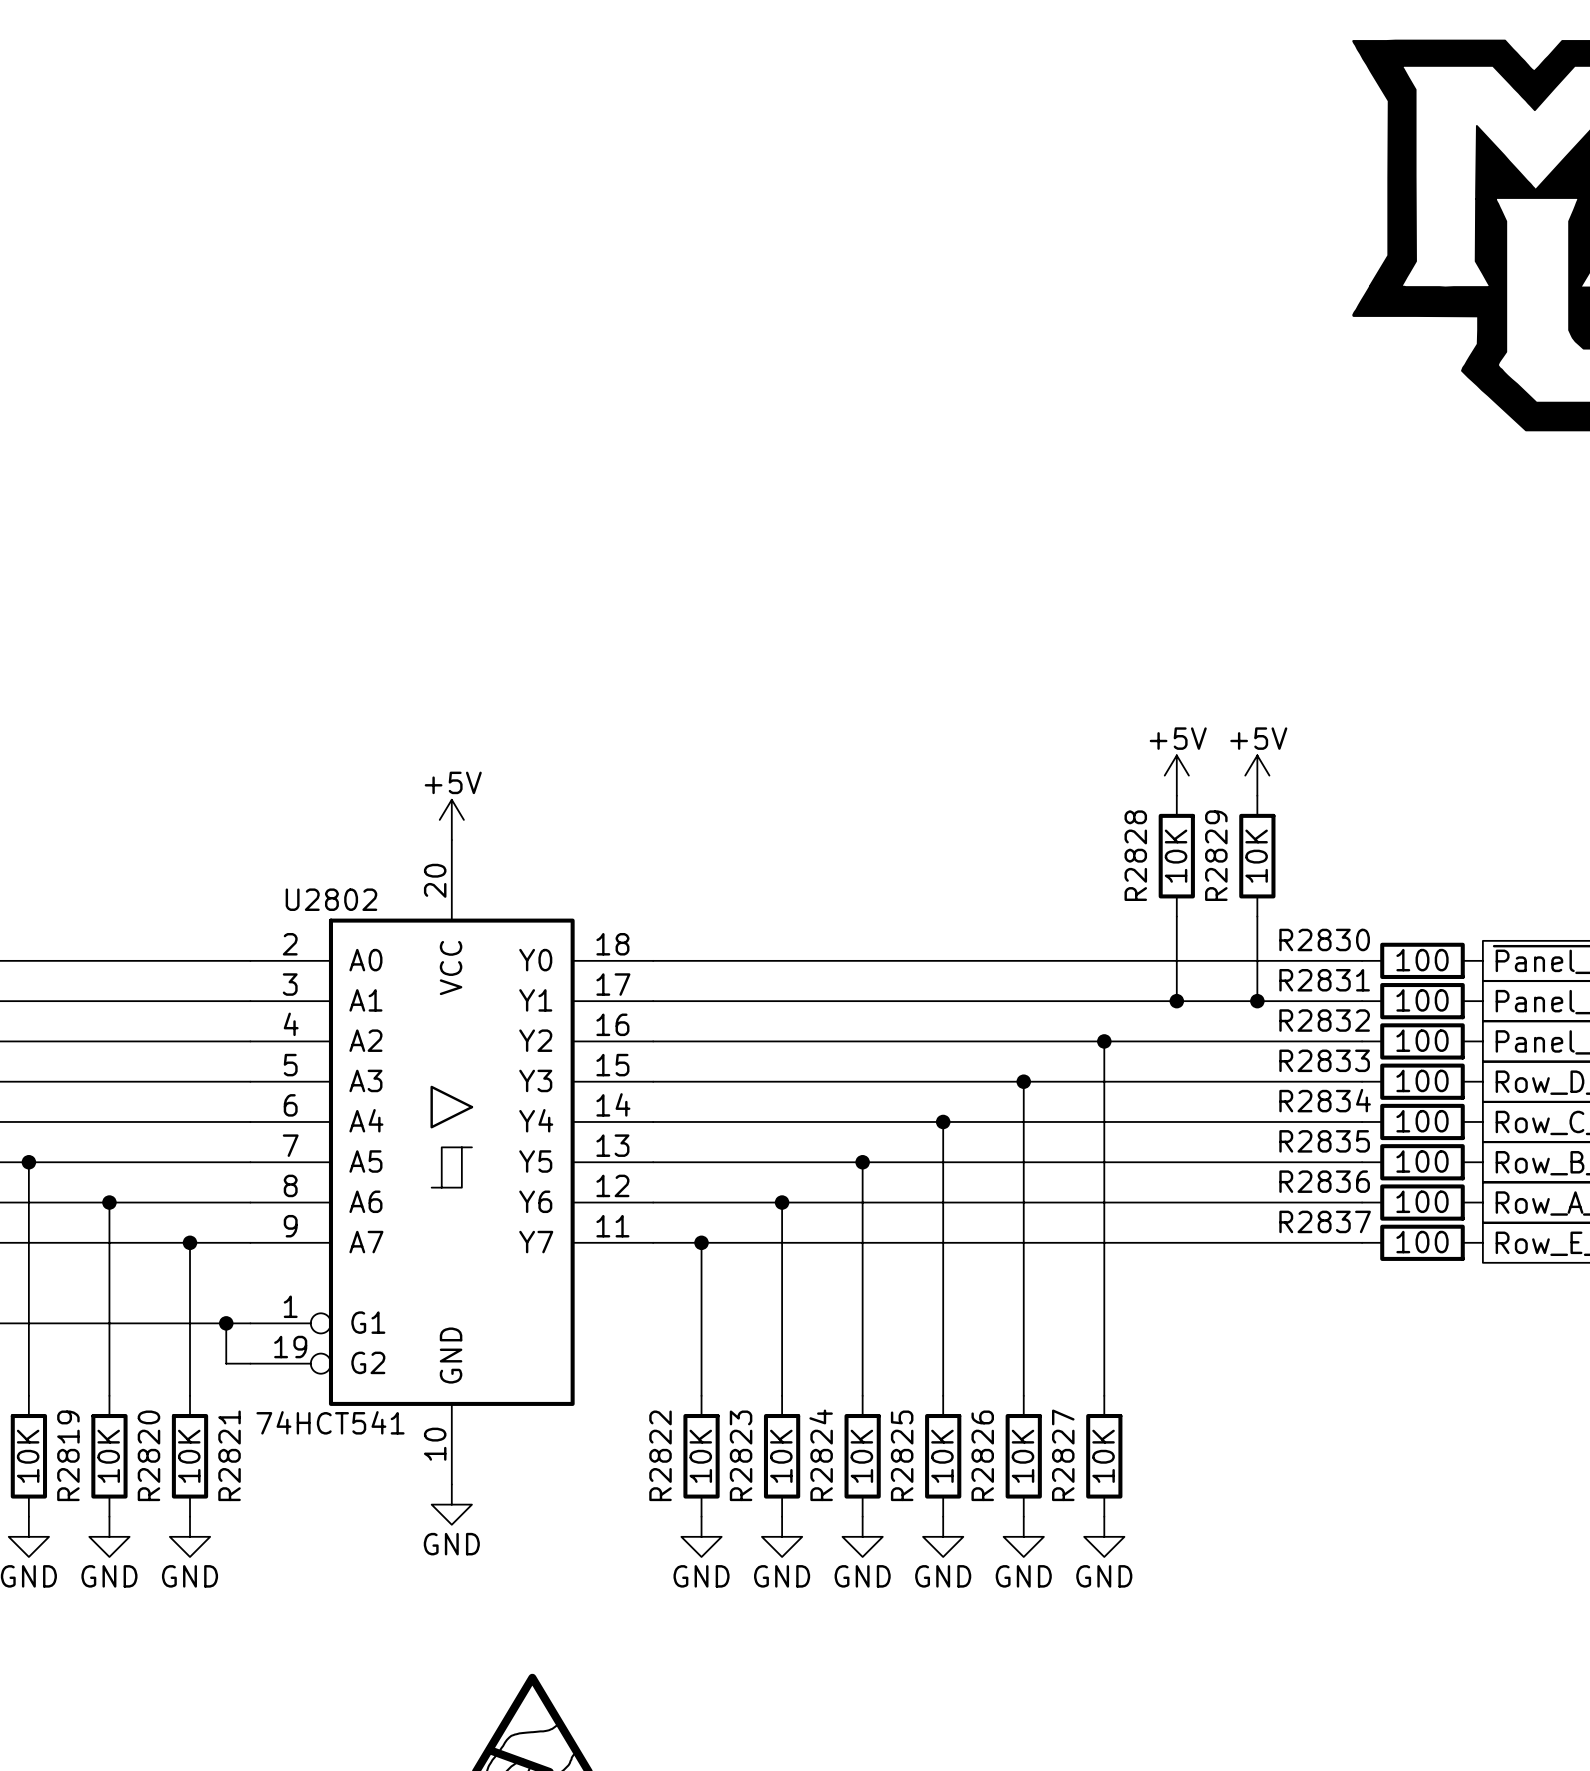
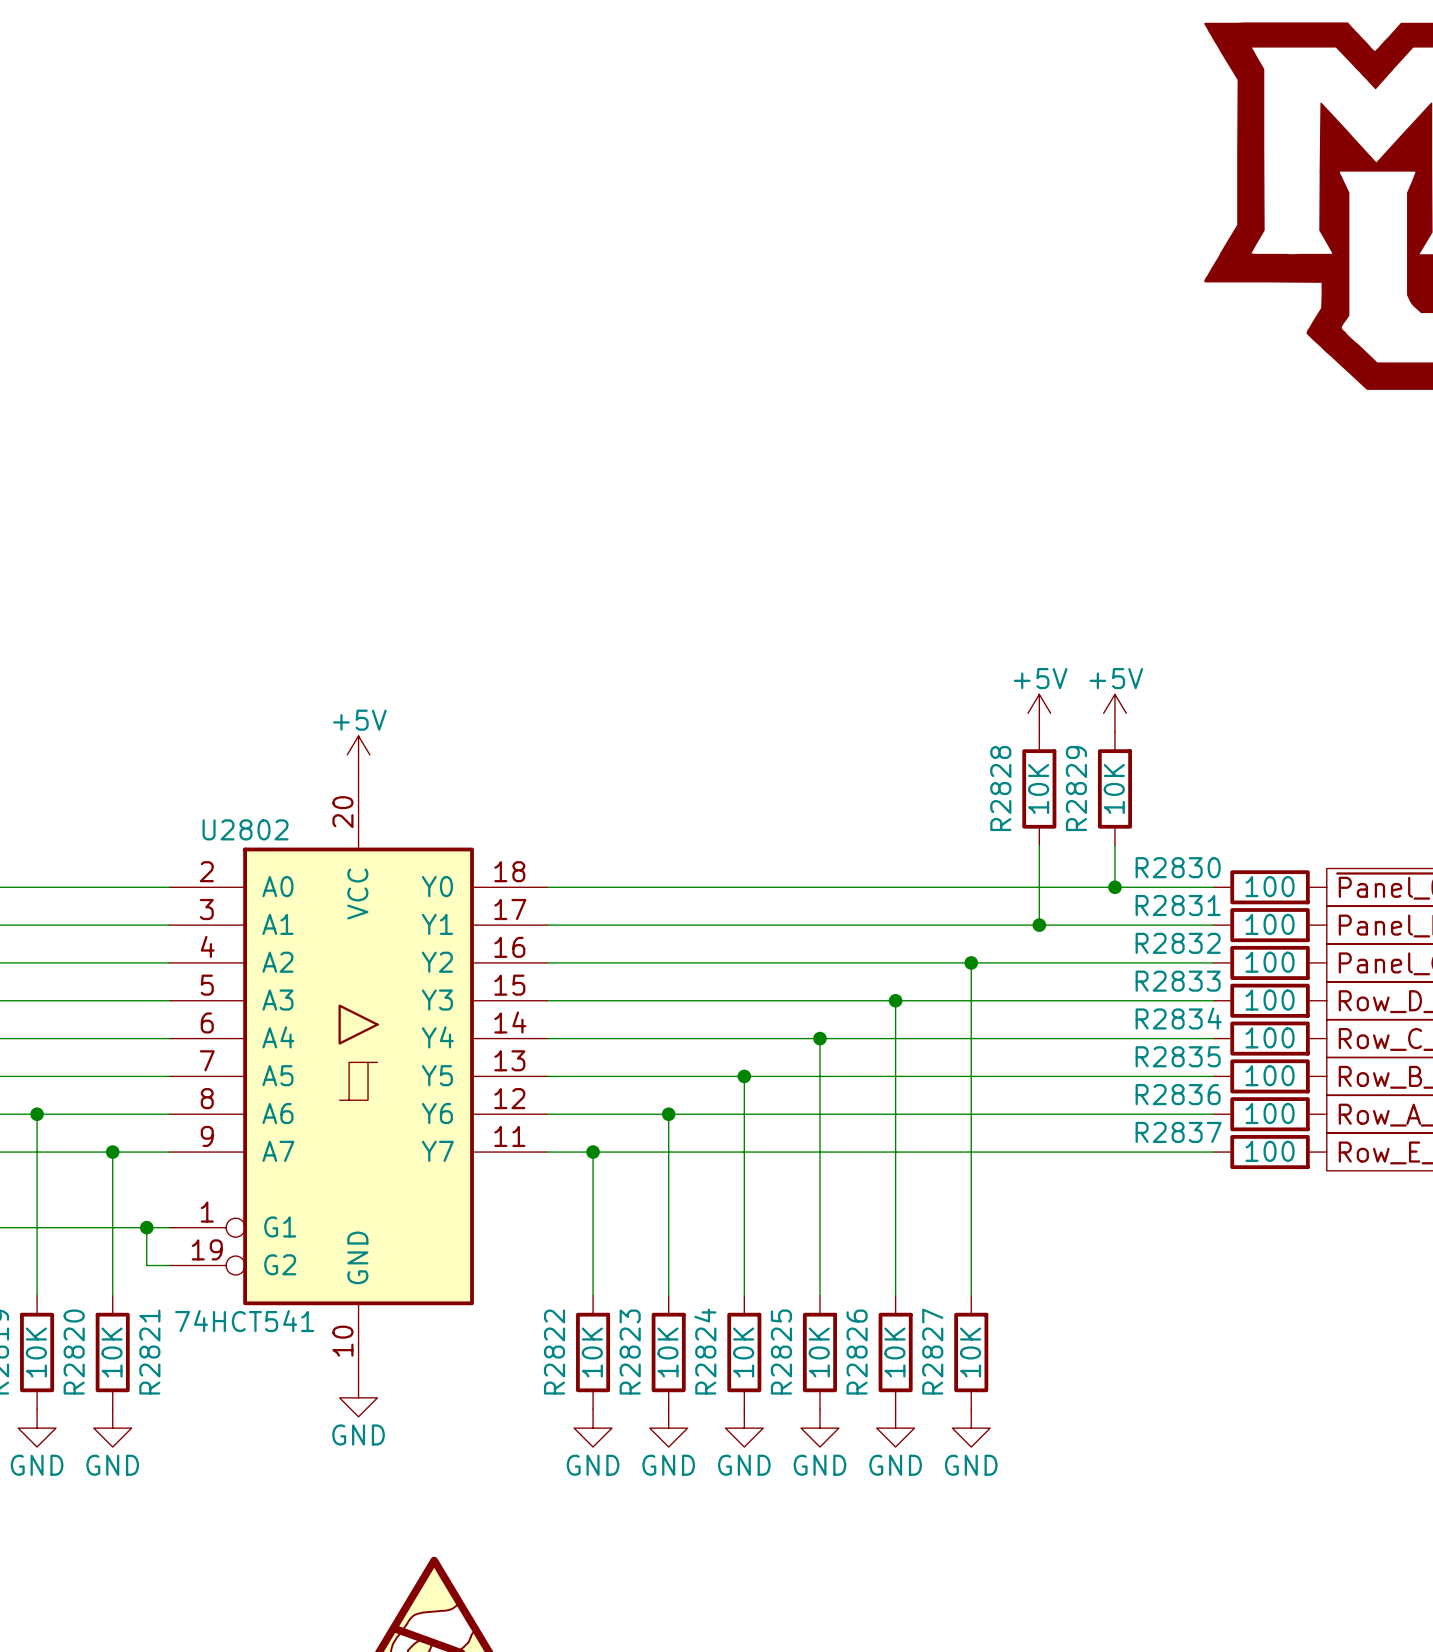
wire: (1257, 960) (1257, 1001) -> none
junction position: (1257, 1001) -> (1114, 887)

